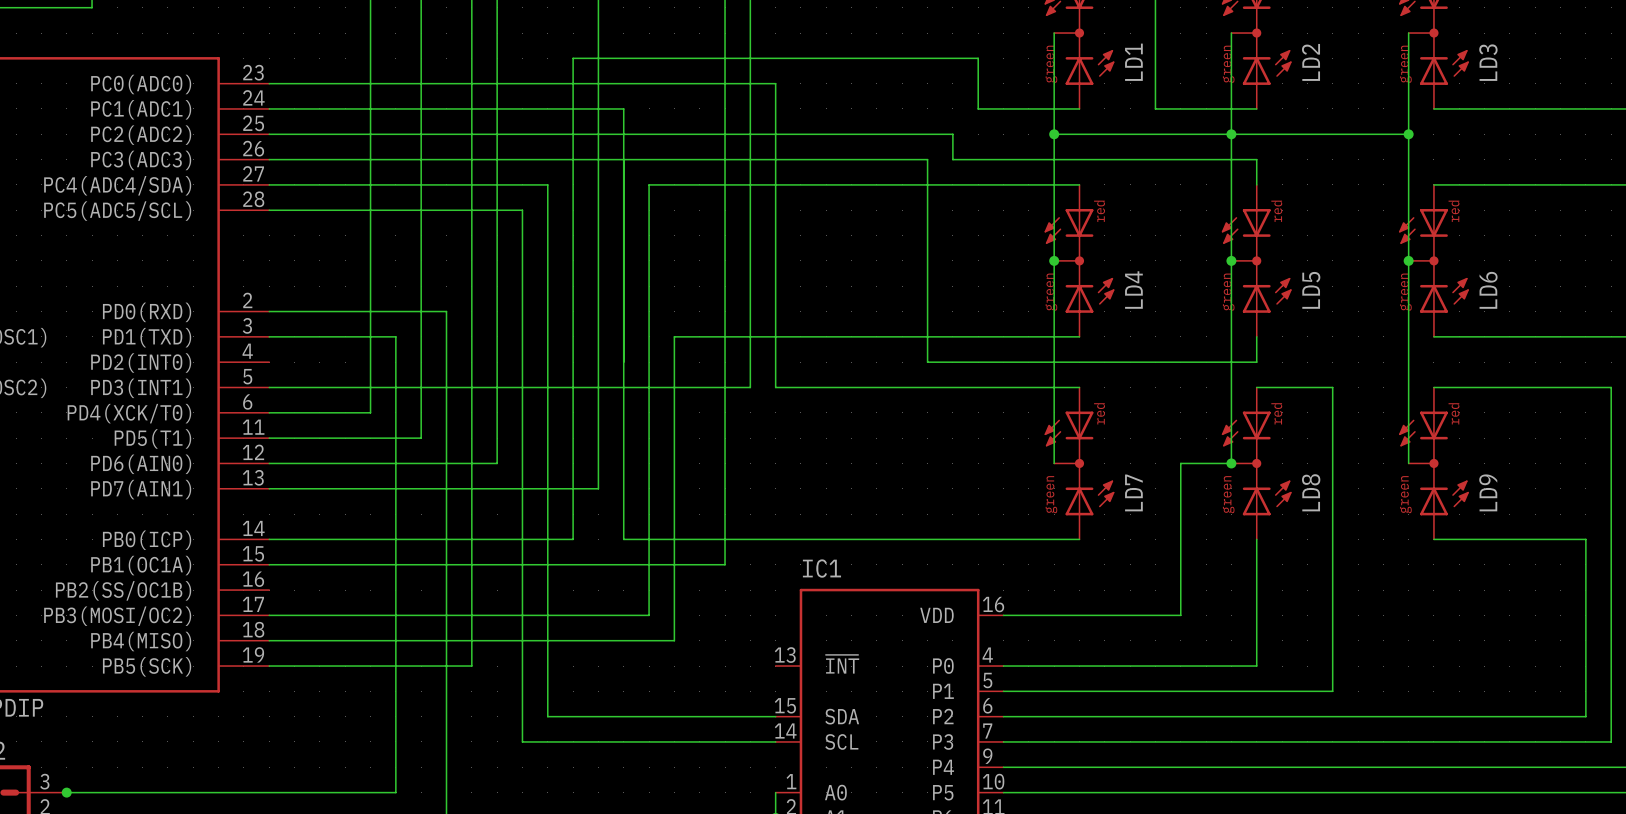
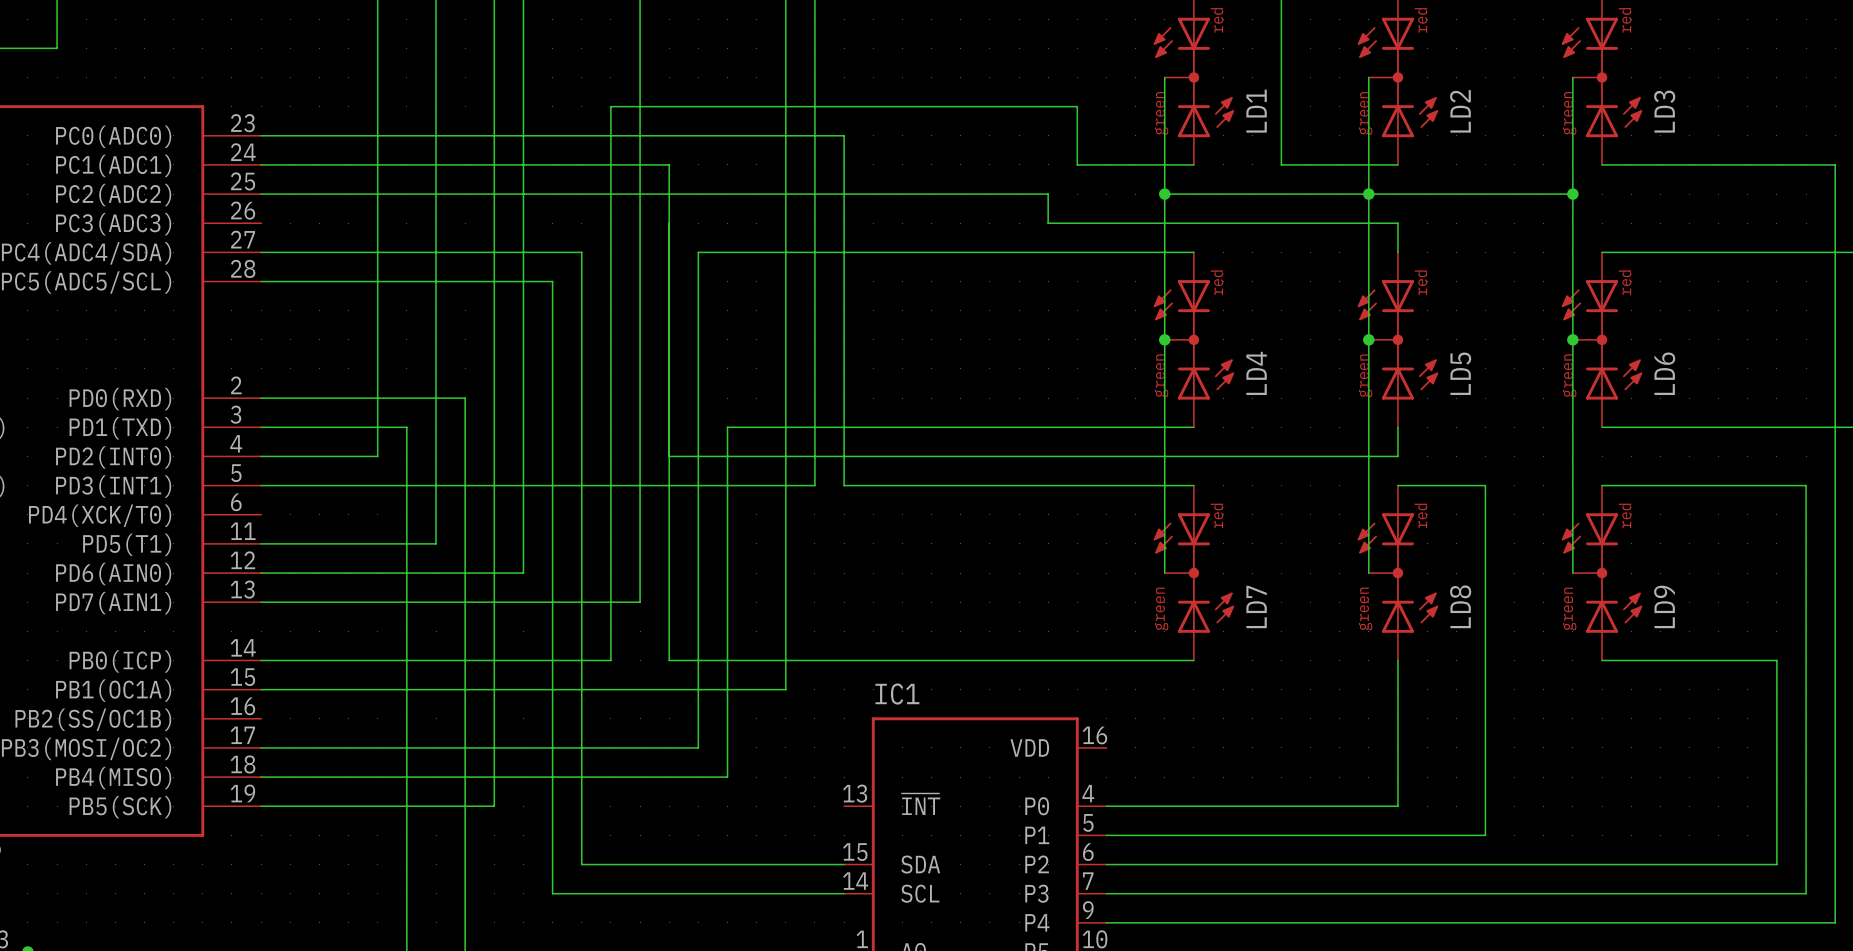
wire: (269, 159) (927, 159) (927, 362) -> (669, 456) (1019, 456)
wire: (370, 362) (370, 412) (269, 412) -> (377, 456) (261, 456)
wire: (1231, 463) (1180, 463) (1180, 615) (1003, 615) -> none
junction: (1231, 463) -> none

